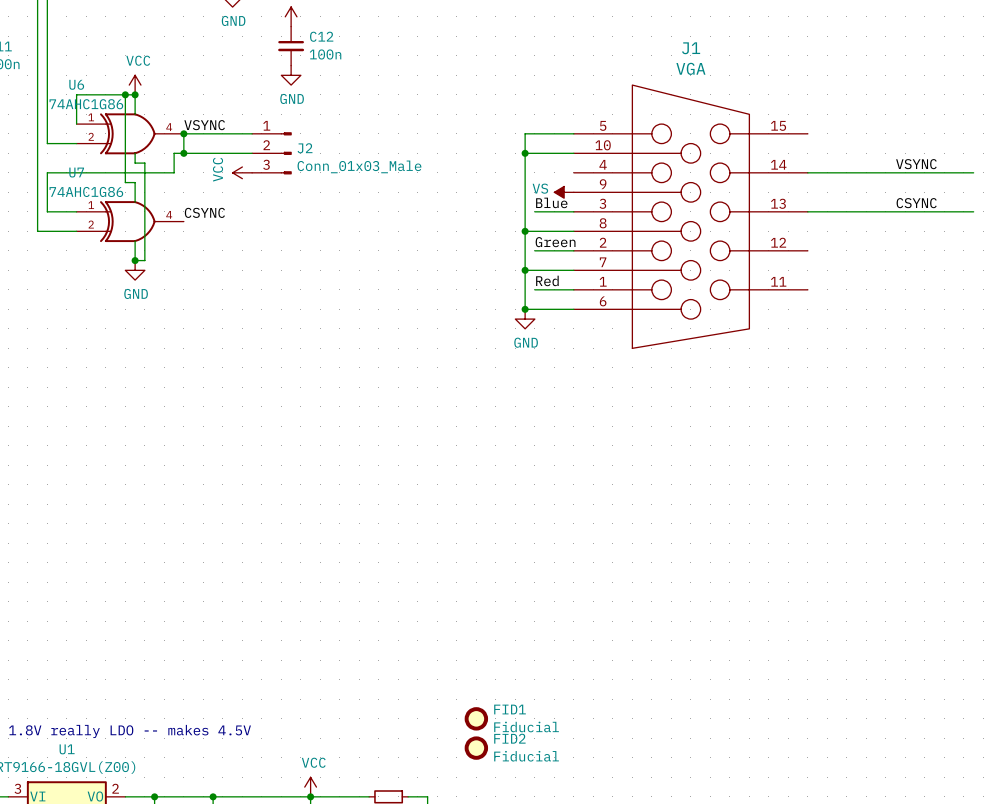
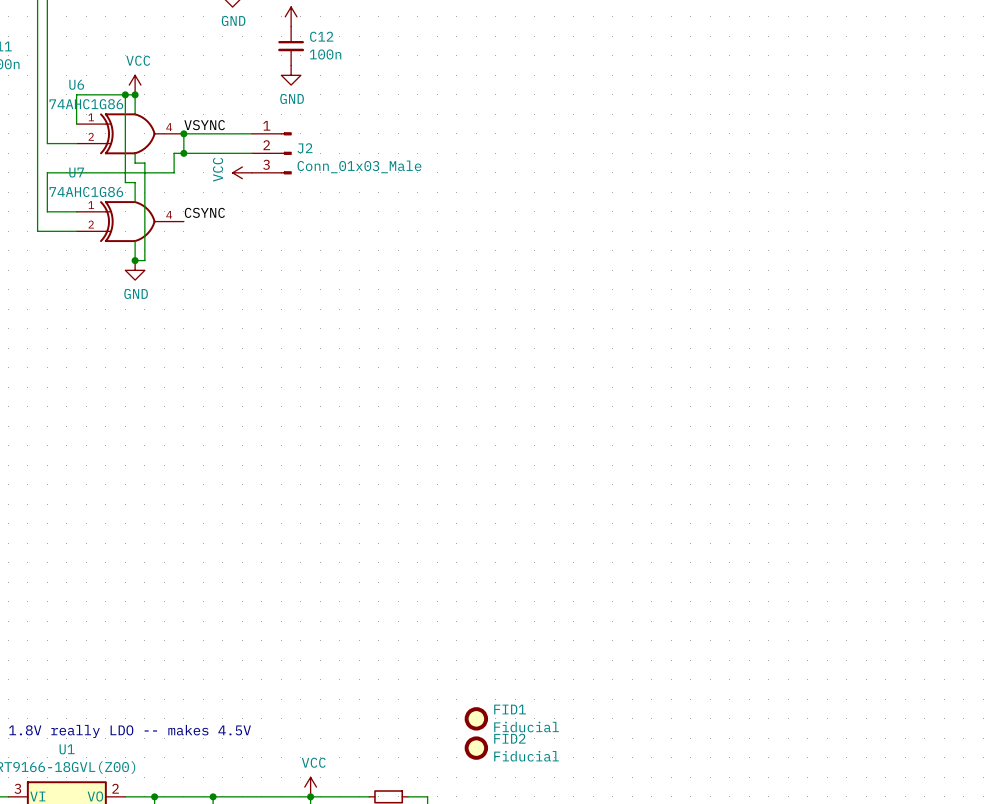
wire: (573, 133) (525, 133) (525, 309) (573, 309) -> none
wire: (525, 153) (573, 153) -> none
junction: (525, 153) -> none
label: VSYNC (916, 164) -> none
wire: (807, 172) (973, 172) -> none
power symbol: VS (564, 192) -> none
label: Blue (551, 202) -> none
label: CSYNC (916, 203) -> none
wire: (534, 211) (573, 211) -> none
wire: (807, 211) (973, 211) -> none
J1: VGA (690, 216) -> none
wire: (525, 231) (573, 231) -> none
junction: (525, 231) -> none
label: Green (555, 242) -> none
wire: (534, 250) (573, 250) -> none
wire: (525, 270) (573, 270) -> none
junction: (525, 270) -> none
label: Red (547, 280) -> none
wire: (534, 289) (573, 289) -> none
junction: (525, 309) -> none
power symbol: GND (525, 319) -> none

